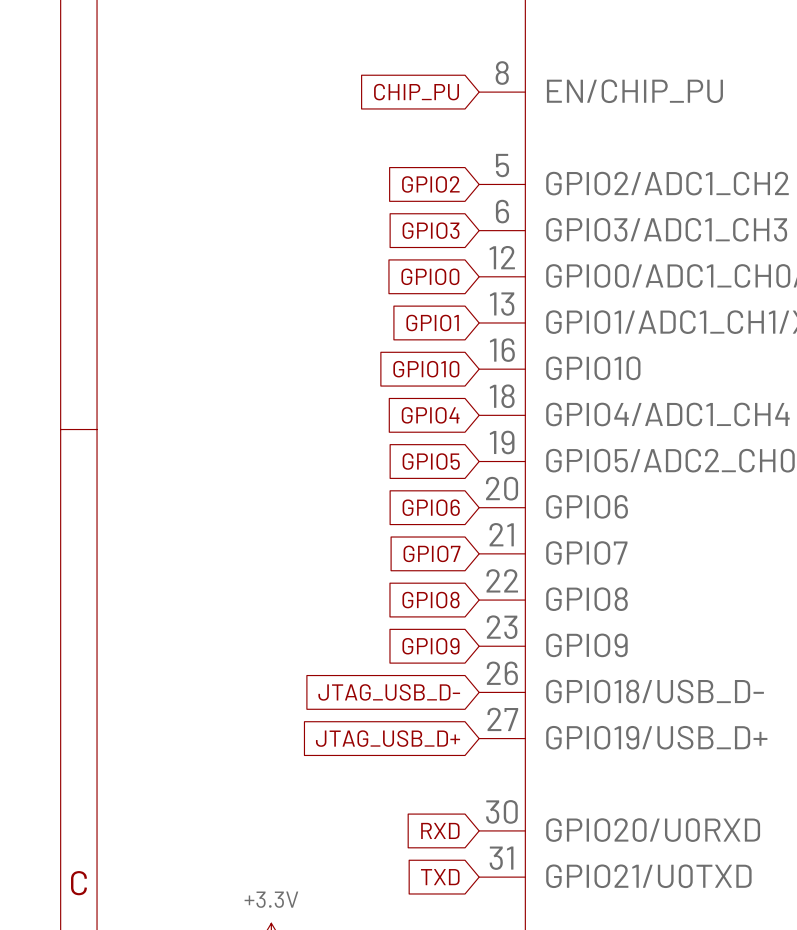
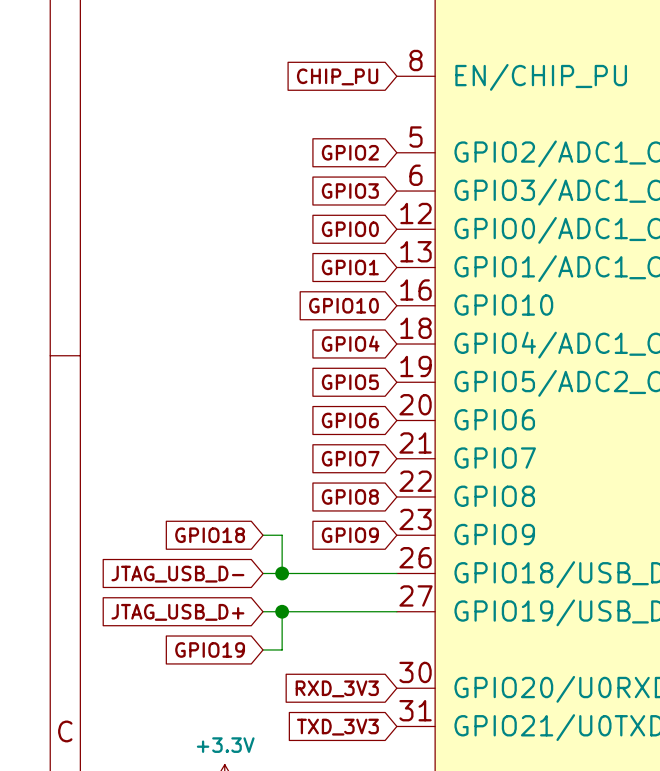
global label: none -> GPIO18 (210, 535)
wire: none -> (263, 535) (282, 535) (282, 573)
wire: none -> (263, 573) (396, 573)
junction: none -> (282, 573)
global label position: JTAG_USB_D- (389, 692) -> JTAG_USB_D- (177, 574)
wire: none -> (263, 611) (396, 611)
wire: none -> (282, 611) (282, 649) (263, 649)
junction: none -> (282, 611)
global label position: JTAG_USB_D+ (388, 738) -> JTAG_USB_D+ (177, 612)
global label: none -> GPIO19 (210, 649)
global label: RXD (440, 830) -> RXD_3V3 (337, 688)
global label: TXD (440, 877) -> TXD_3V3 (337, 727)

